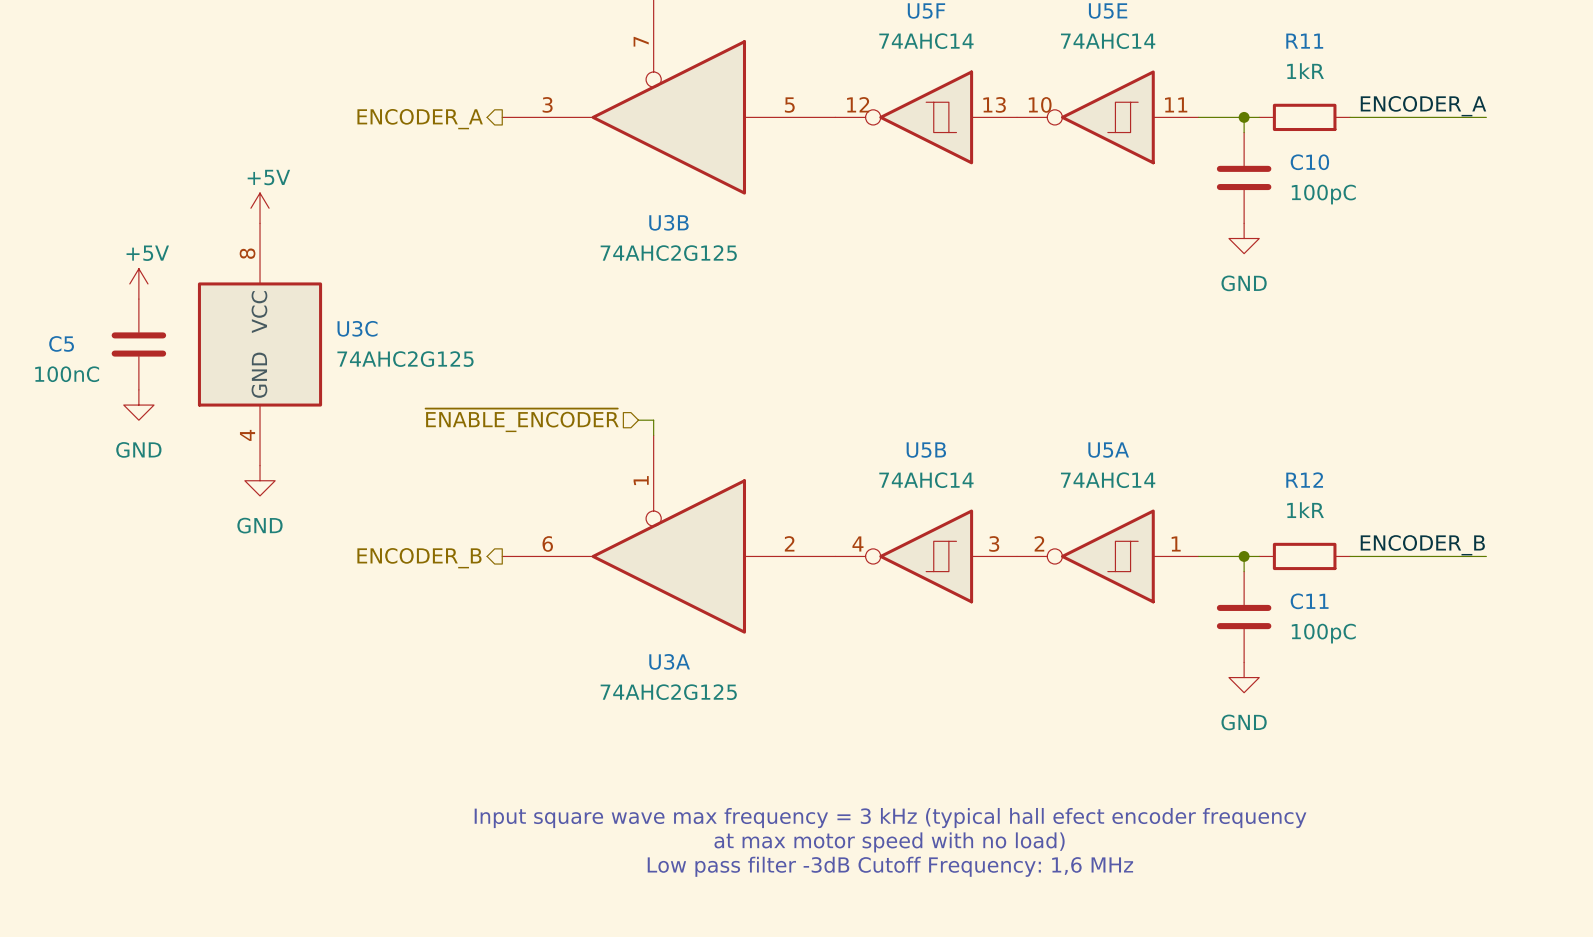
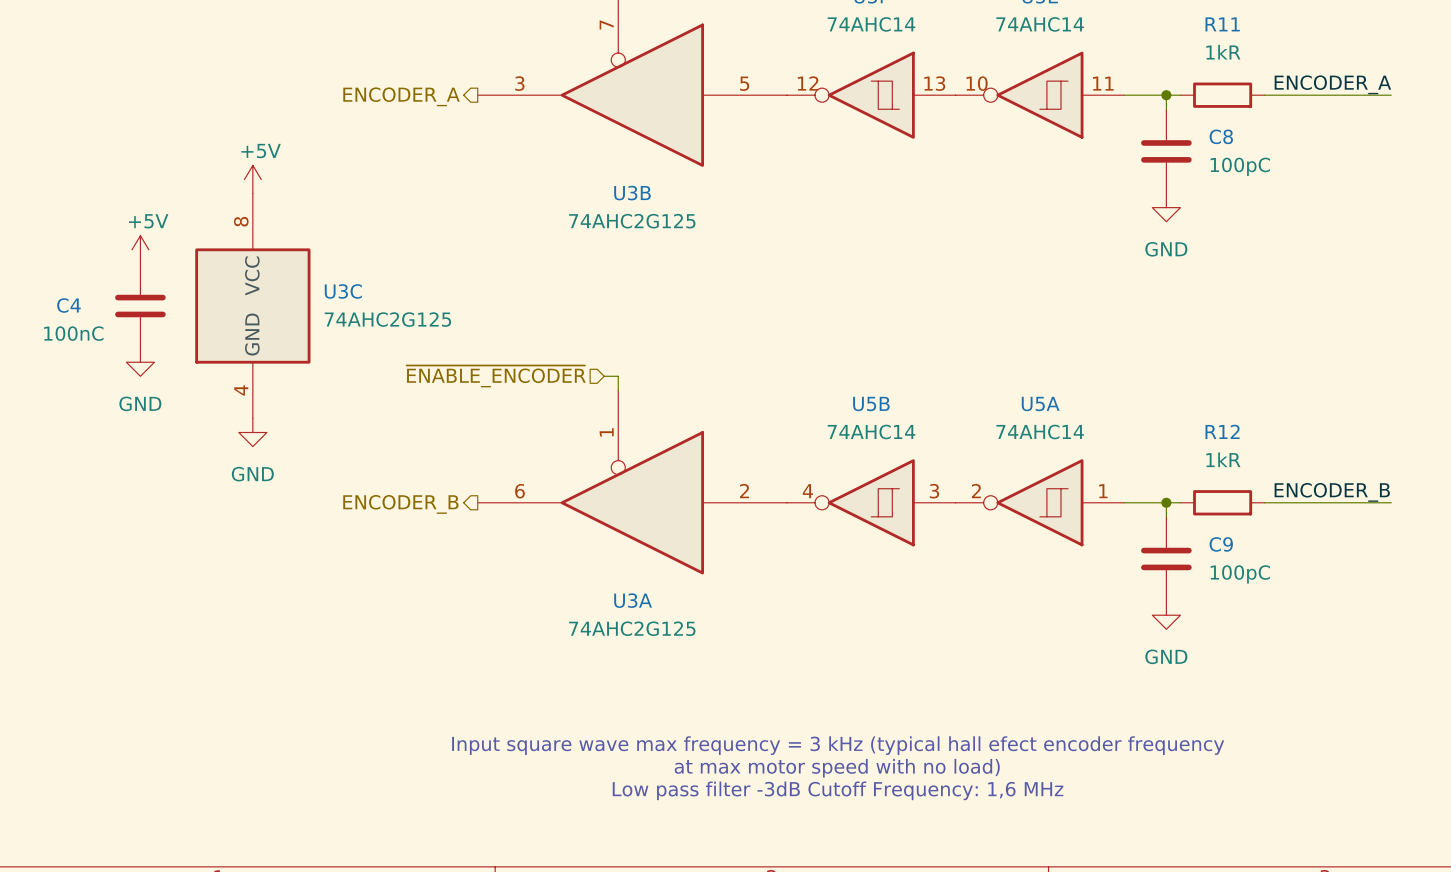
C10 name: C10 (1309, 162) -> C8 (1221, 136)
C5 name: C5 (61, 343) -> C4 (68, 305)
C11 name: C11 (1309, 601) -> C9 (1221, 544)

